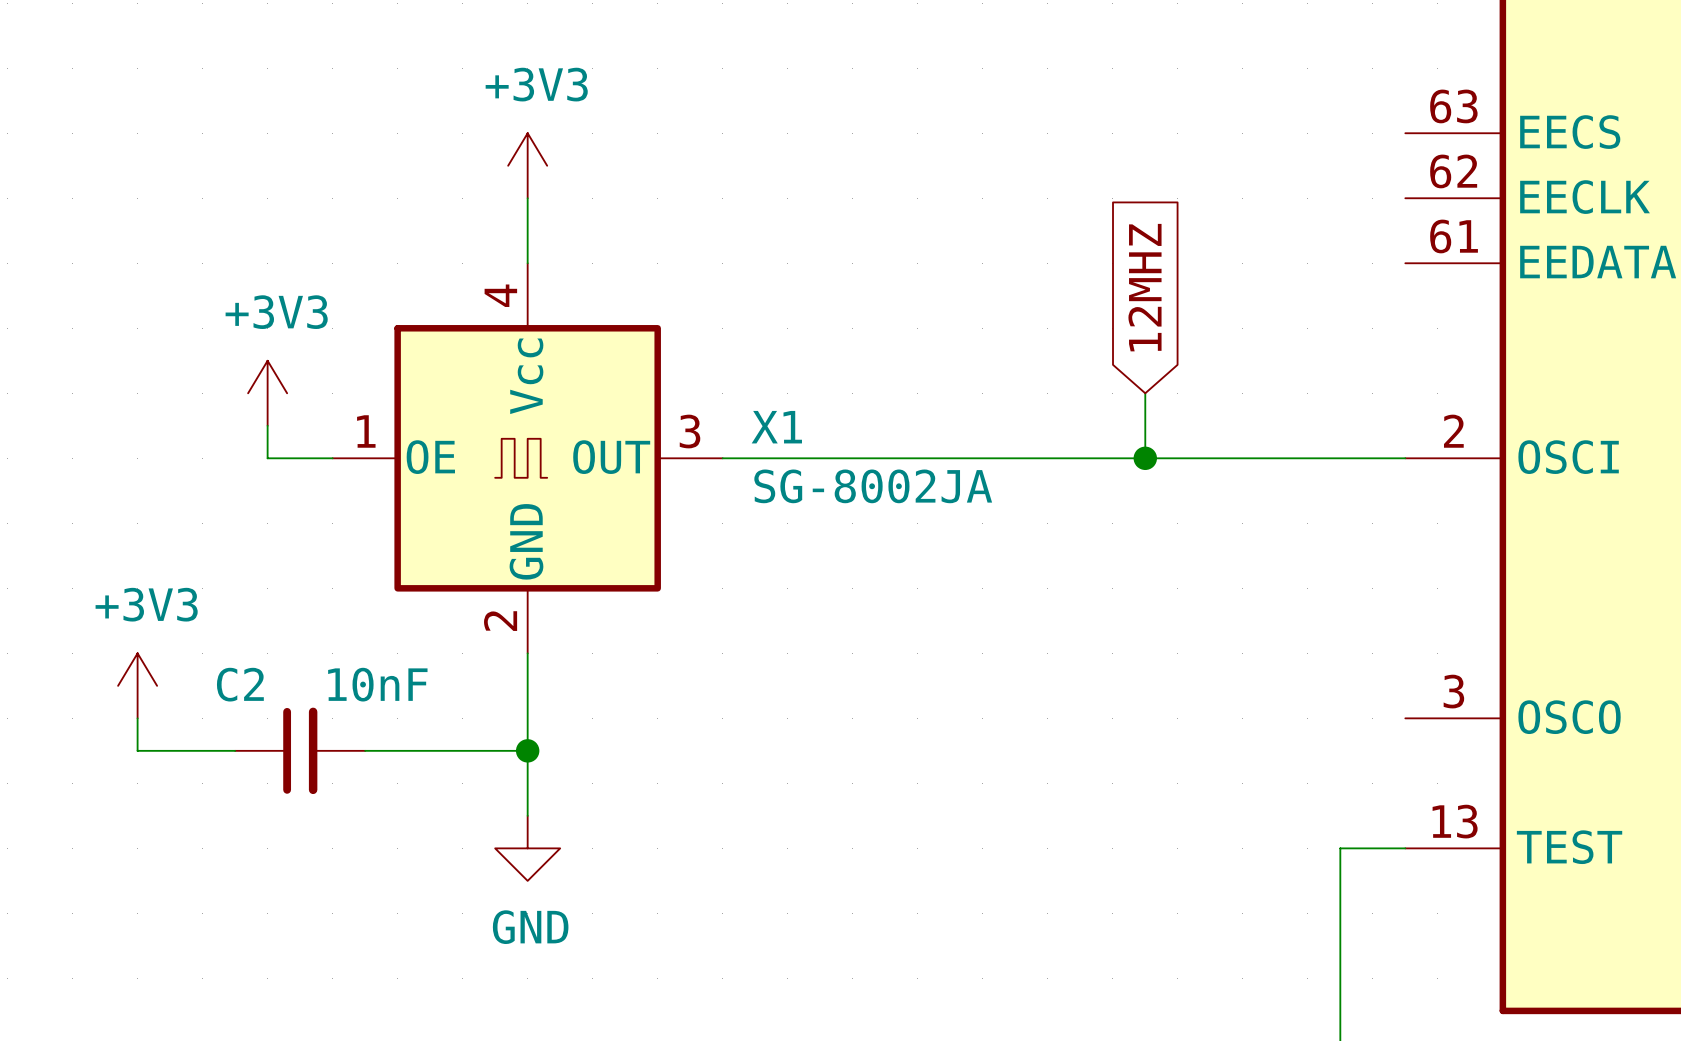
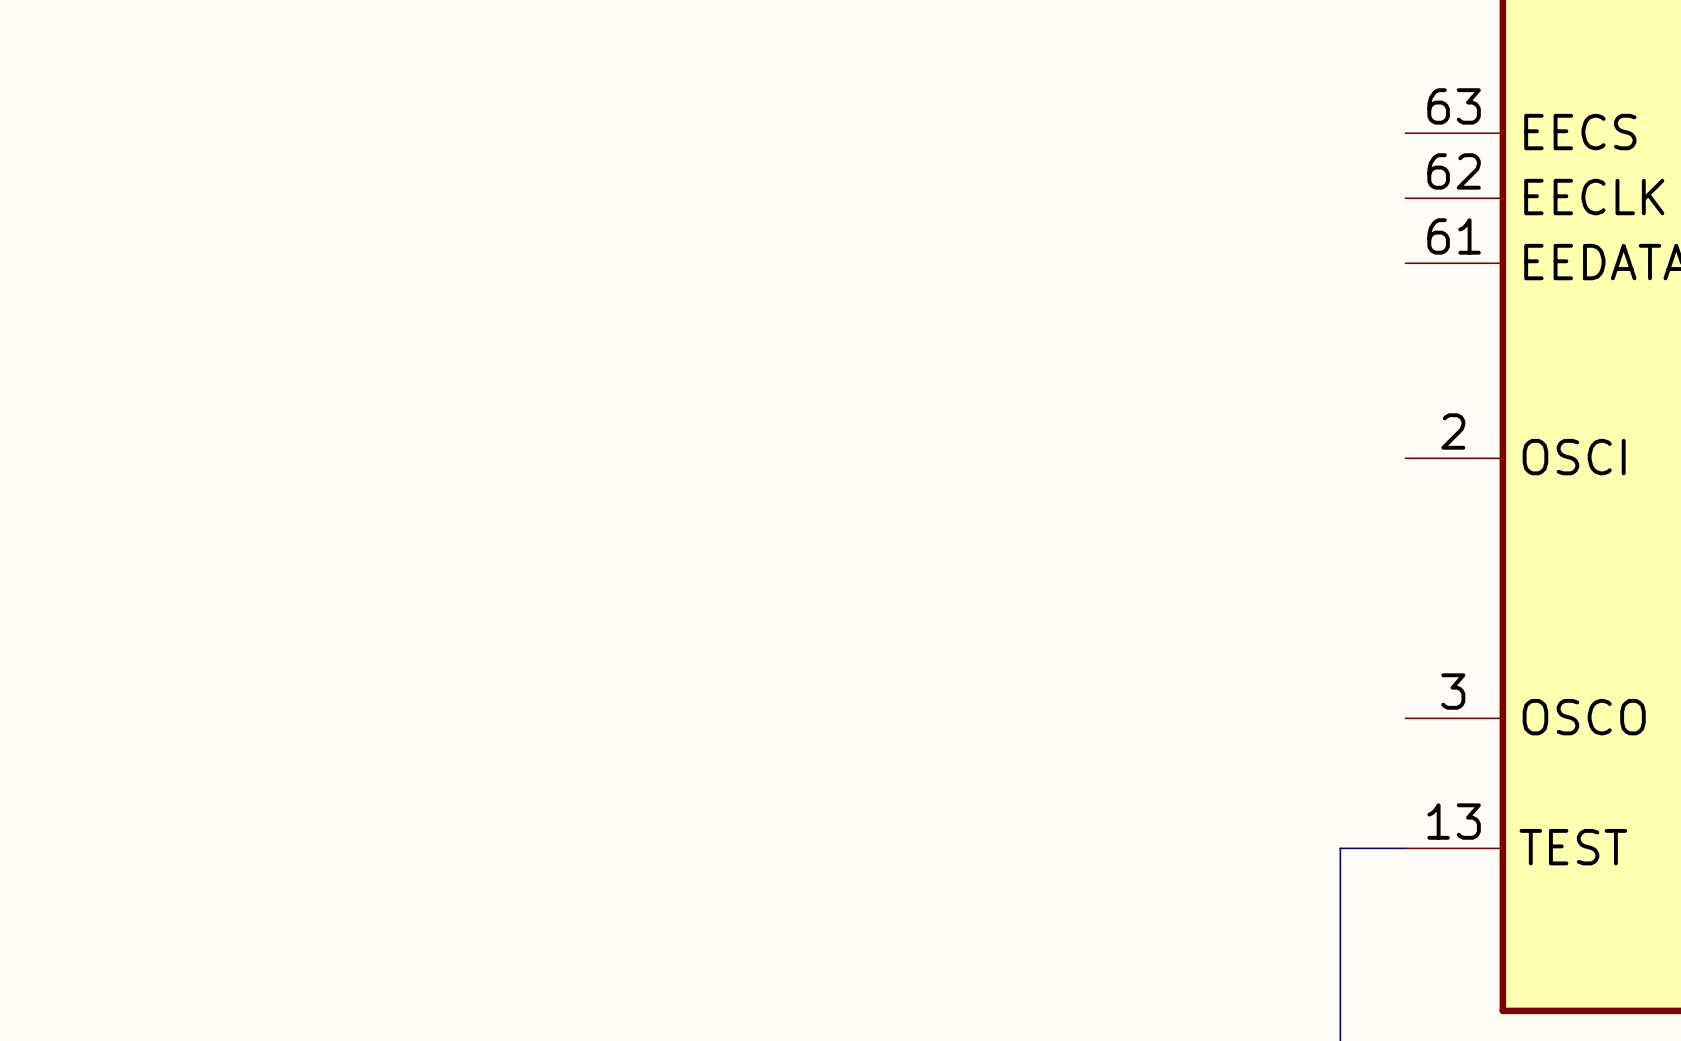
power symbol: +3V3 (527, 165) -> none
wire: (527, 198) (527, 263) -> none
global label: 12MHZ (1144, 287) -> none
power symbol: +3V3 (267, 393) -> none
wire: (1145, 393) (1145, 458) -> none
wire: (267, 425) (267, 458) (332, 458) -> none
X1: SG-8002JA (527, 458) -> none
wire: (722, 458) (1405, 458) -> none
junction: (1145, 458) -> none
wire: (527, 653) (527, 815) -> none
power symbol: +3V3 (137, 685) -> none
wire: (137, 718) (137, 750) (235, 750) -> none
C2: 10nF (300, 750) -> none
wire: (365, 750) (527, 750) -> none
junction: (527, 750) -> none
power symbol: GND (527, 848) -> none

